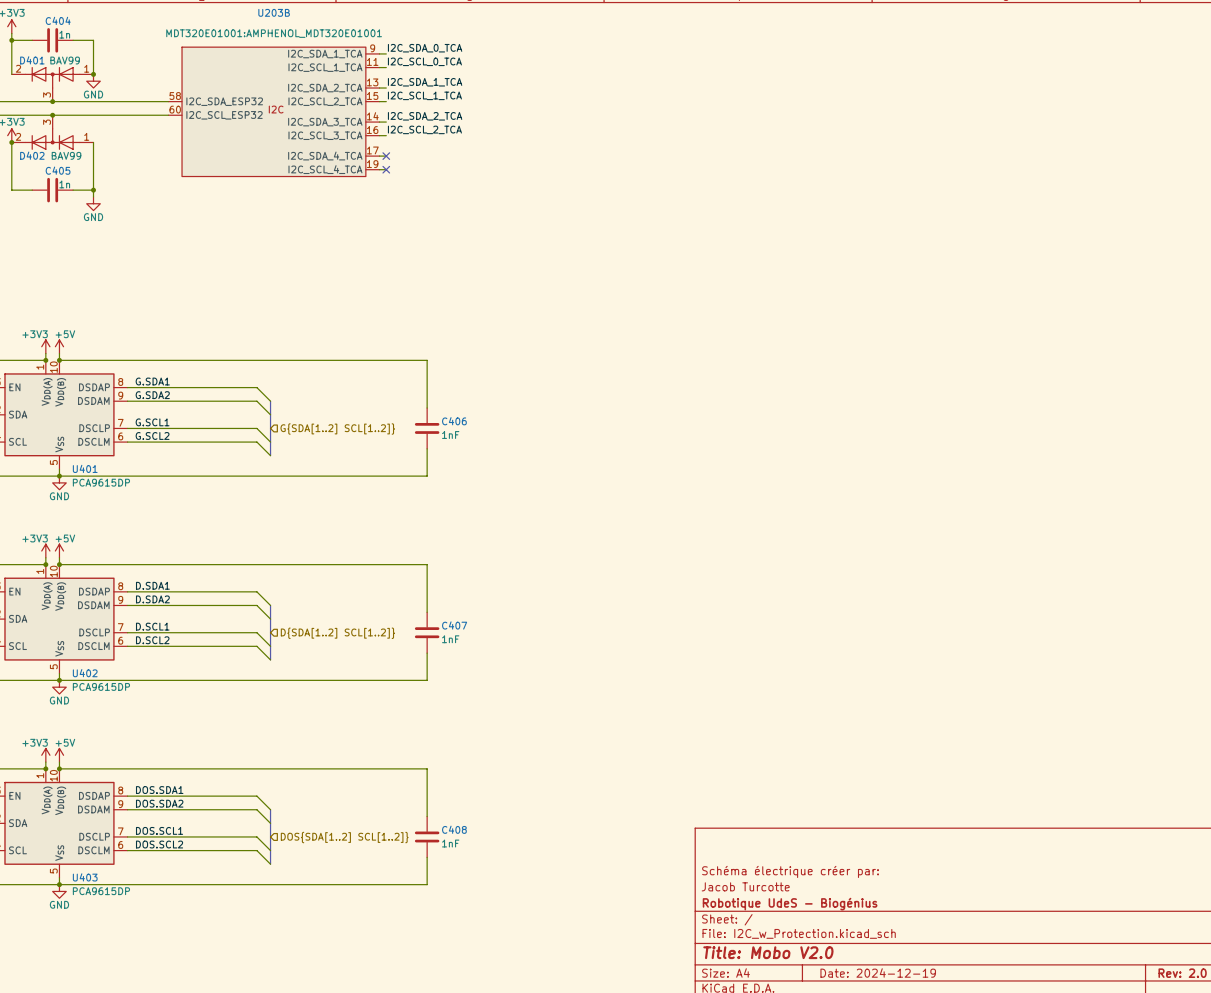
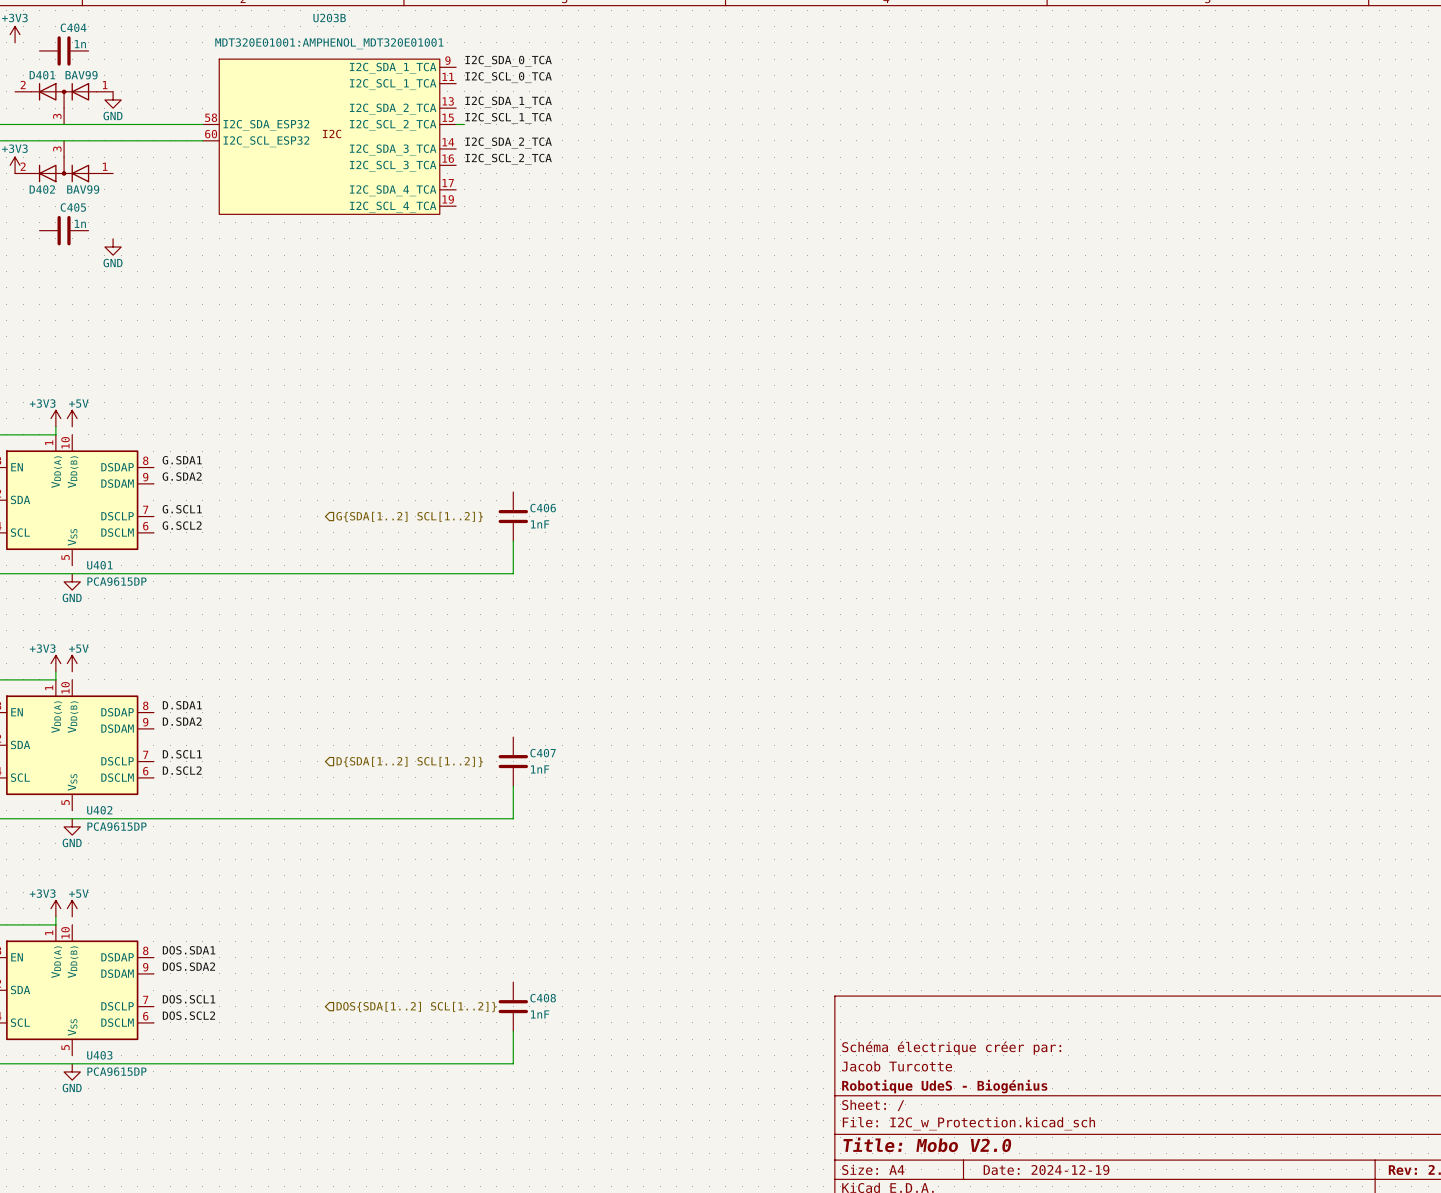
wire: (11, 33) (11, 74) -> none
wire: (11, 40) (32, 40) -> none
junction: (11, 40) -> none
wire: (73, 40) (93, 40) (93, 74) -> none
wire: (379, 53) (386, 53) -> none
wire: (379, 67) (386, 67) -> none
junction: (93, 74) -> none
wire: (379, 88) (386, 88) -> none
junction: (52, 101) -> none
junction: (52, 115) -> none
wire: (379, 122) (386, 122) -> none
wire: (379, 135) (386, 135) -> none
wire: (11, 142) (11, 190) (32, 190) -> none
junction: (11, 142) -> none
wire: (93, 142) (93, 196) -> none
wire: (379, 156) (386, 156) -> none
no-connect mark: (386, 156) -> none
wire: (379, 169) (386, 169) -> none
no-connect mark: (386, 169) -> none
wire: (73, 190) (93, 190) -> none
junction: (93, 190) -> none
wire: (59, 353) (59, 360) (427, 360) (427, 408) -> none
junction: (45, 360) -> none
junction: (59, 360) -> none
wire: (127, 387) (256, 387) (270, 401) -> none
wire: (127, 401) (256, 401) (270, 414) -> none
bus: (270, 401) (270, 455) -> none
wire: (127, 428) (256, 428) (270, 442) -> none
wire: (127, 442) (256, 442) (270, 455) -> none
wire: (59, 469) (59, 476) -> none
junction: (59, 476) -> none
wire: (59, 557) (59, 564) (427, 564) (427, 612) -> none
junction: (45, 564) -> none
junction: (59, 564) -> none
wire: (127, 591) (256, 591) (270, 605) -> none
wire: (127, 605) (256, 605) (270, 619) -> none
bus: (270, 605) (270, 659) -> none
wire: (127, 632) (256, 632) (270, 646) -> none
wire: (127, 646) (256, 646) (270, 659) -> none
wire: (59, 673) (59, 680) -> none
junction: (59, 680) -> none
wire: (59, 762) (59, 768) (427, 768) (427, 816) -> none
junction: (45, 768) -> none
junction: (59, 768) -> none
wire: (127, 796) (256, 796) (270, 809) -> none
wire: (127, 809) (256, 809) (270, 823) -> none
bus: (270, 809) (270, 864) -> none
wire: (127, 836) (256, 836) (270, 850) -> none
wire: (127, 850) (256, 850) (270, 864) -> none
wire: (59, 877) (59, 884) -> none
junction: (59, 884) -> none

